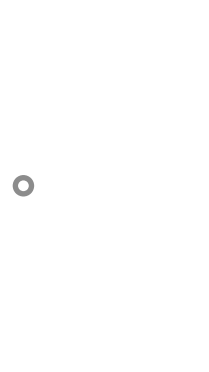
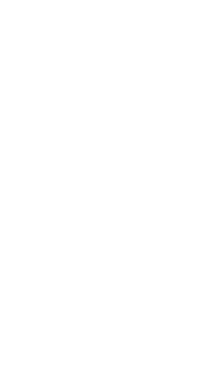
via: (23, 185) -> none

